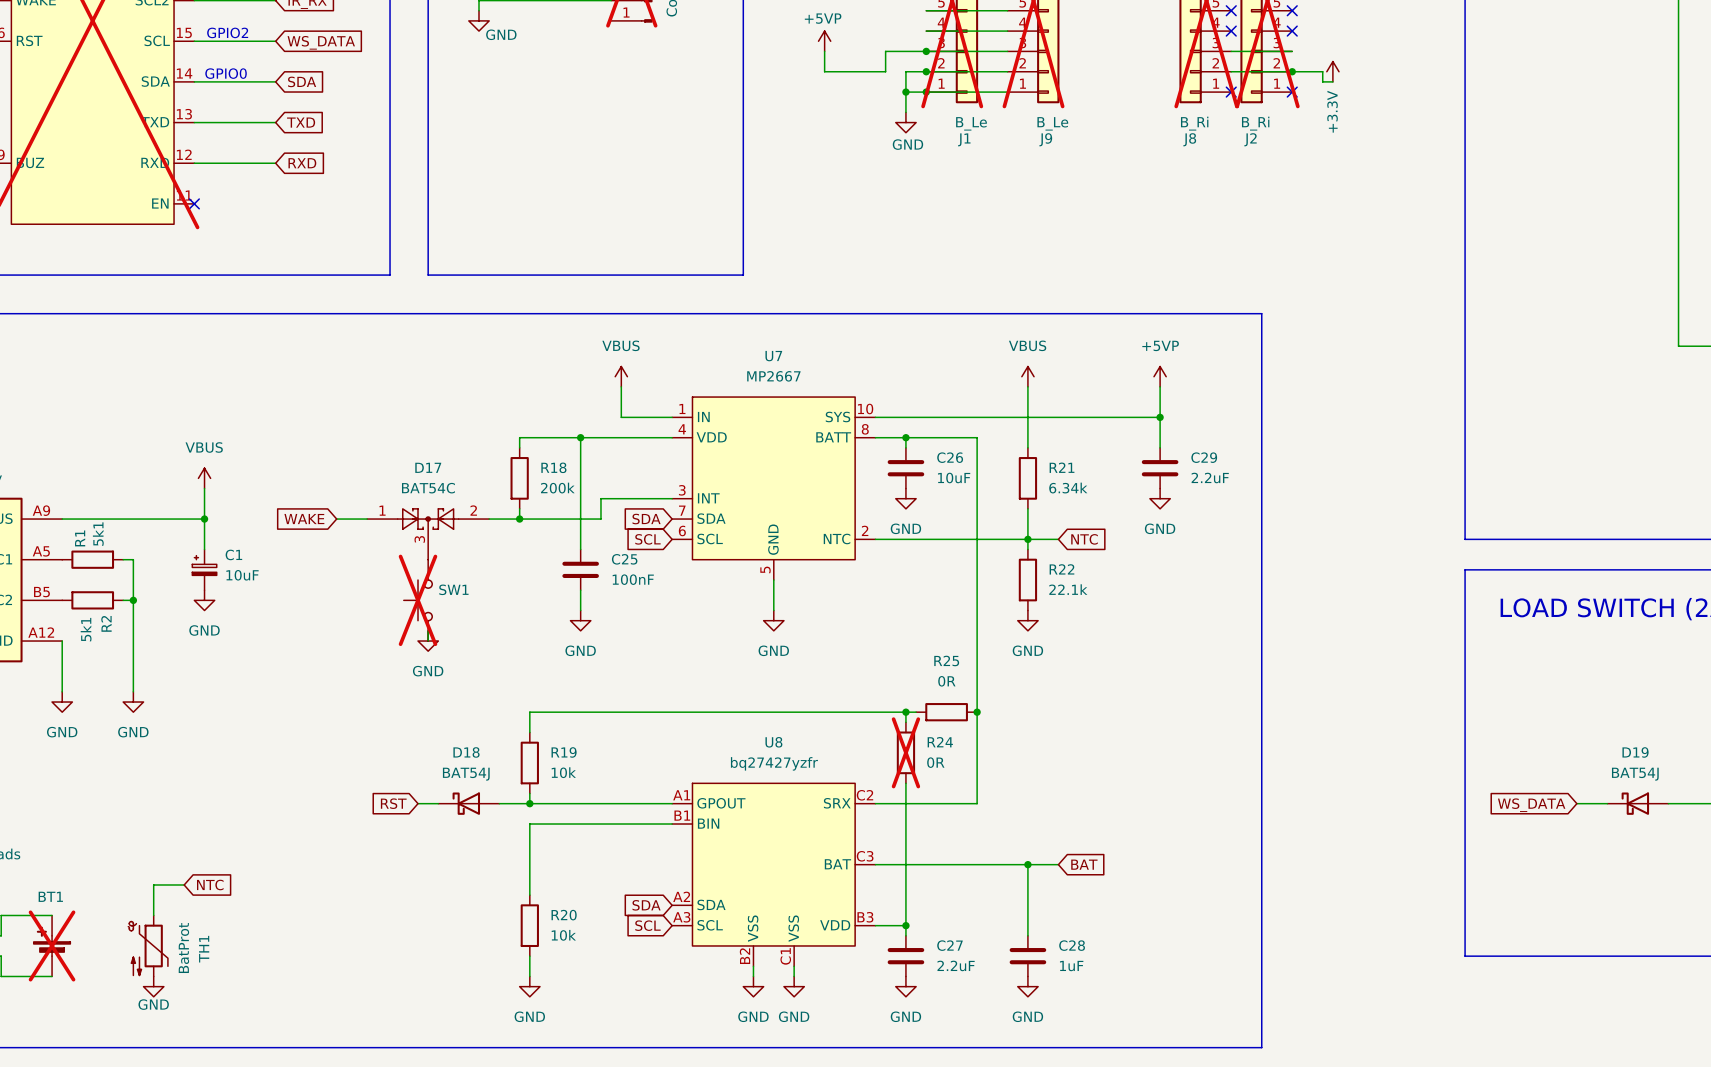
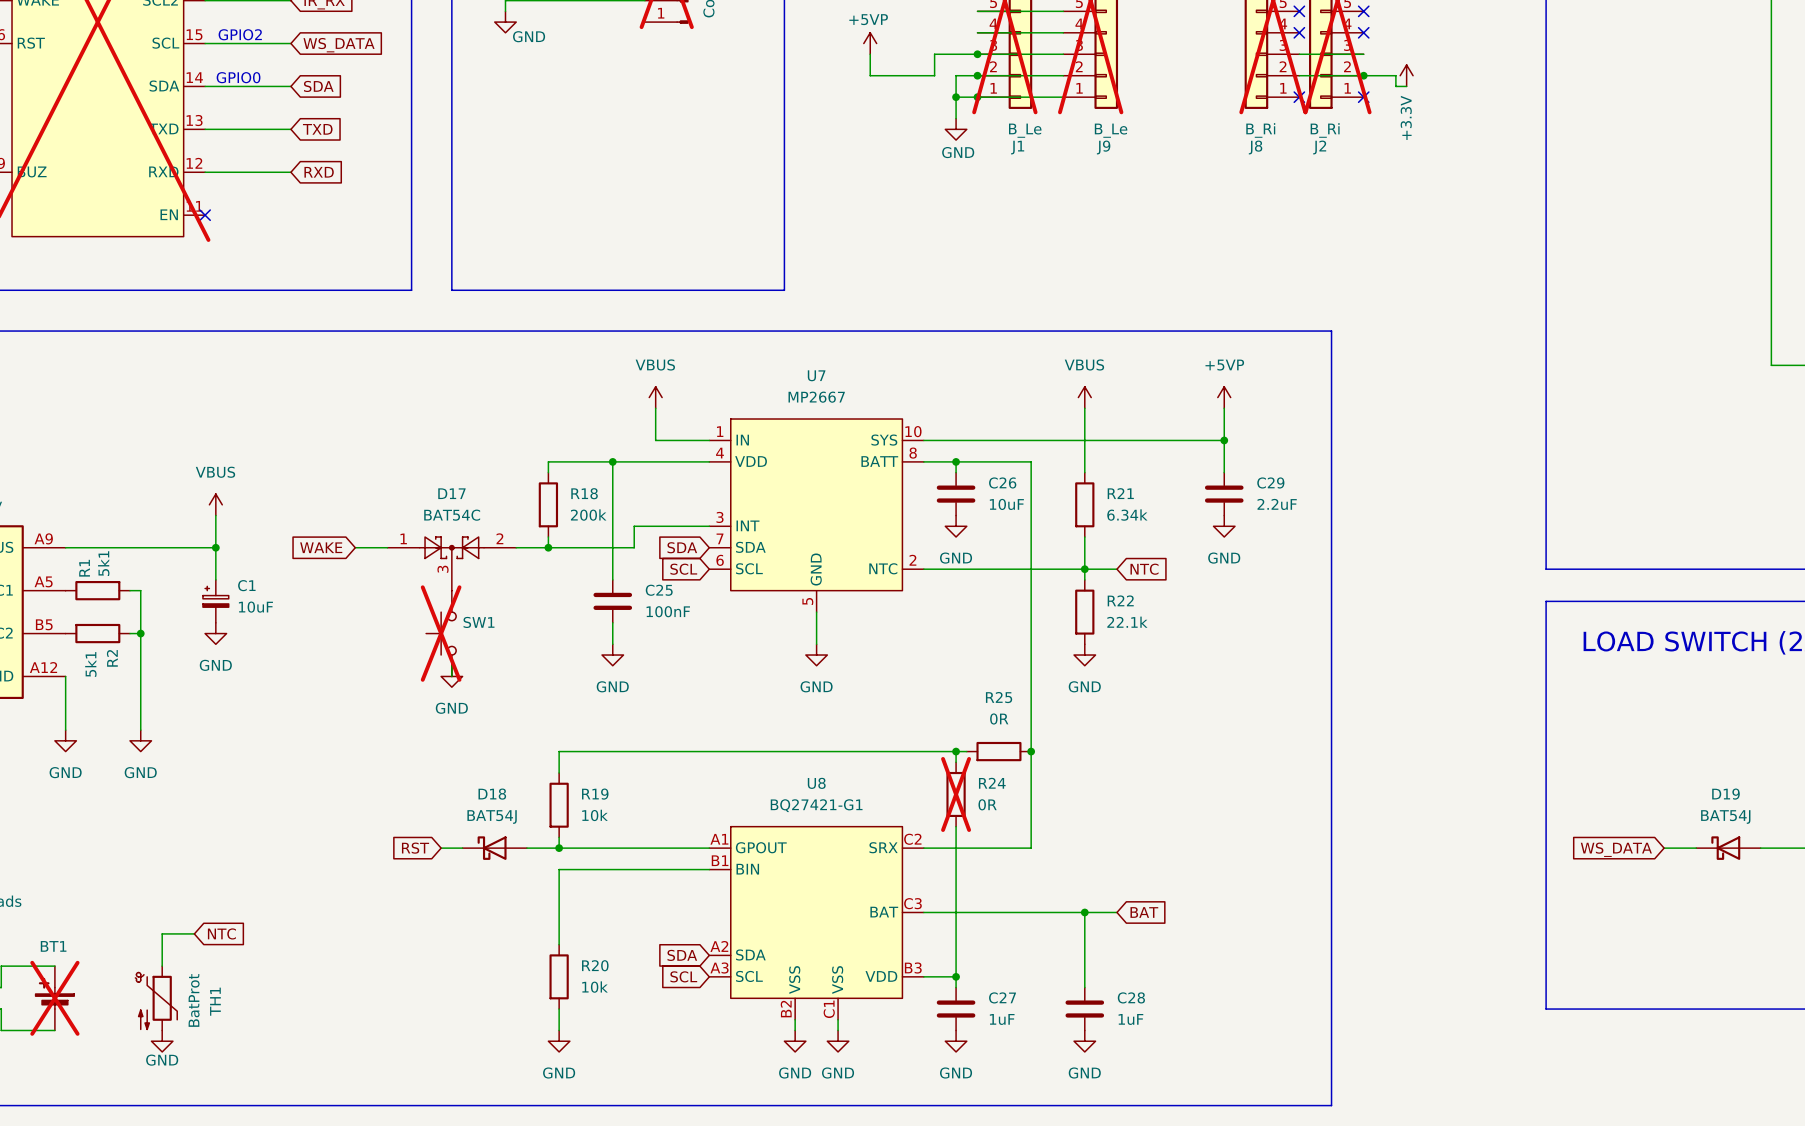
U8 value: bq27427yzfr (774, 763) -> BQ27421-G1 (816, 805)
C27 value: 2.2uF (956, 965) -> 1uF (1002, 1019)

